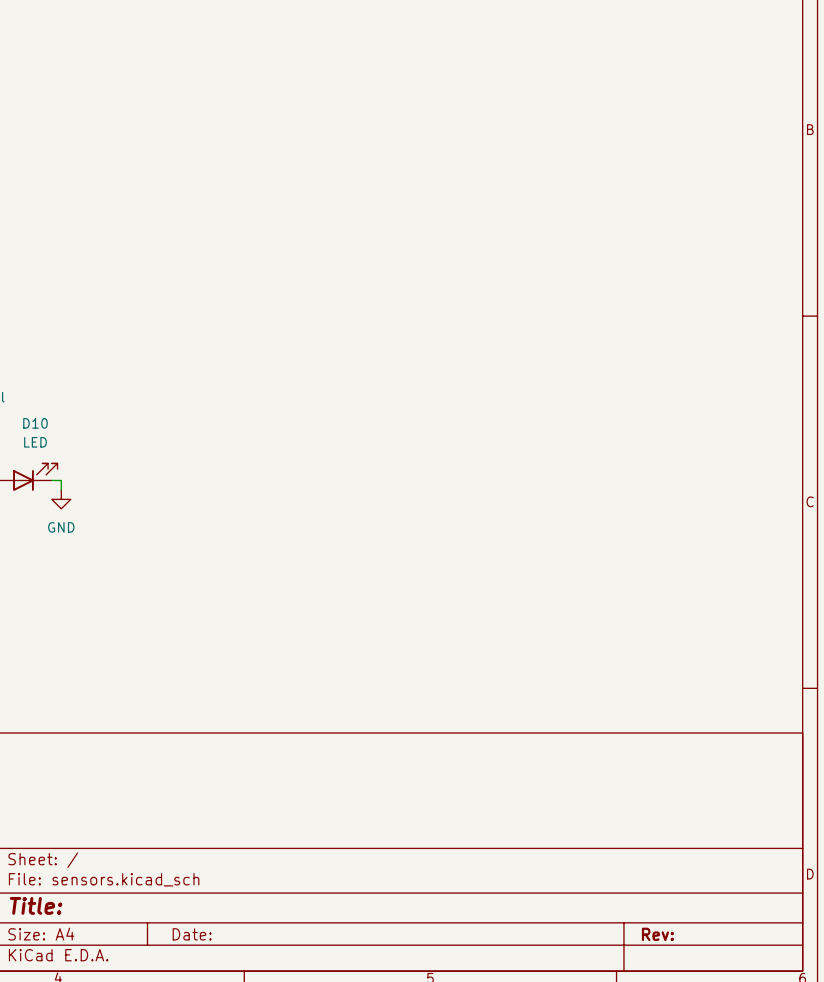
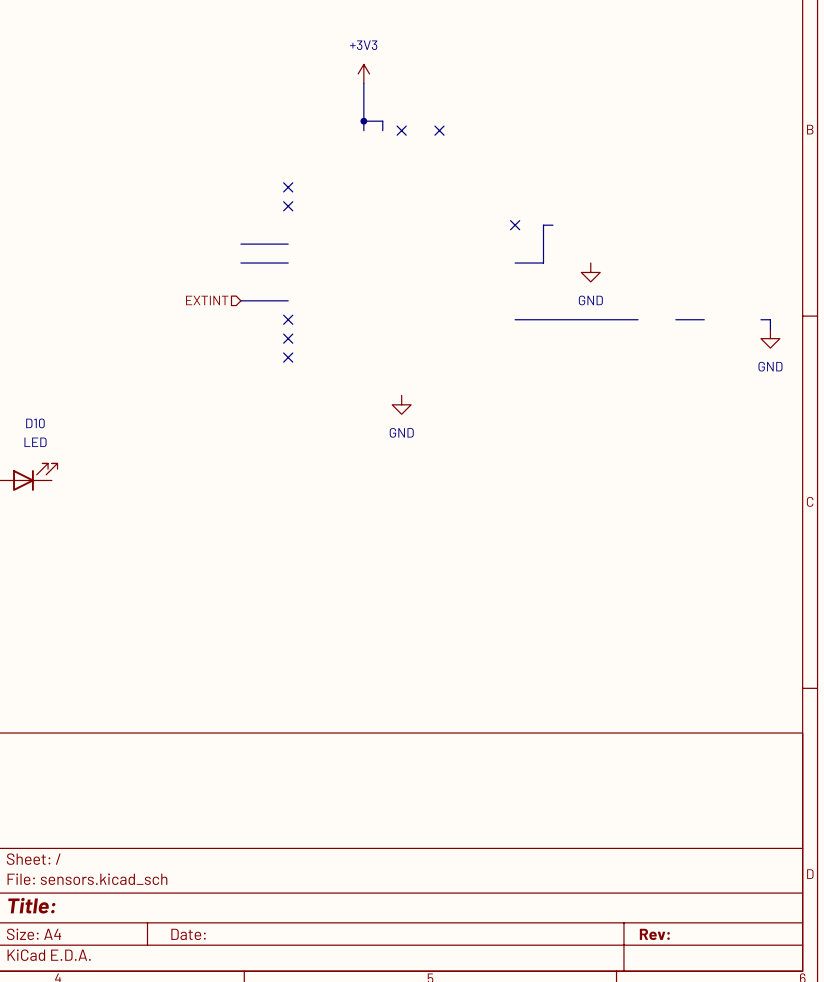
power symbol: none -> +3V3 (363, 73)
wire: none -> (363, 83) (363, 130)
wire: none -> (363, 121) (382, 121) (382, 130)
junction: none -> (363, 121)
no-connect mark: none -> (401, 130)
no-connect mark: none -> (439, 130)
no-connect mark: none -> (288, 187)
no-connect mark: none -> (288, 206)
no-connect mark: none -> (515, 225)
wire: none -> (552, 225) (543, 225) (543, 263) (515, 263)
wire: none -> (240, 244) (288, 244)
wire: none -> (240, 263) (288, 263)
power symbol: none -> GND (590, 272)
hierarchical label: none -> EXTINT (207, 300)
wire: none -> (240, 300) (288, 300)
no-connect mark: none -> (288, 319)
wire: none -> (515, 319) (638, 319)
wire: none -> (675, 319) (704, 319)
wire: none -> (760, 319) (770, 319) (770, 329)
no-connect mark: none -> (288, 338)
power symbol: none -> GND (770, 338)
no-connect mark: none -> (288, 357)
power symbol: none -> GND (401, 404)
wire: (51, 480) (61, 480) (61, 489) -> none
power symbol: GND (61, 499) -> none

